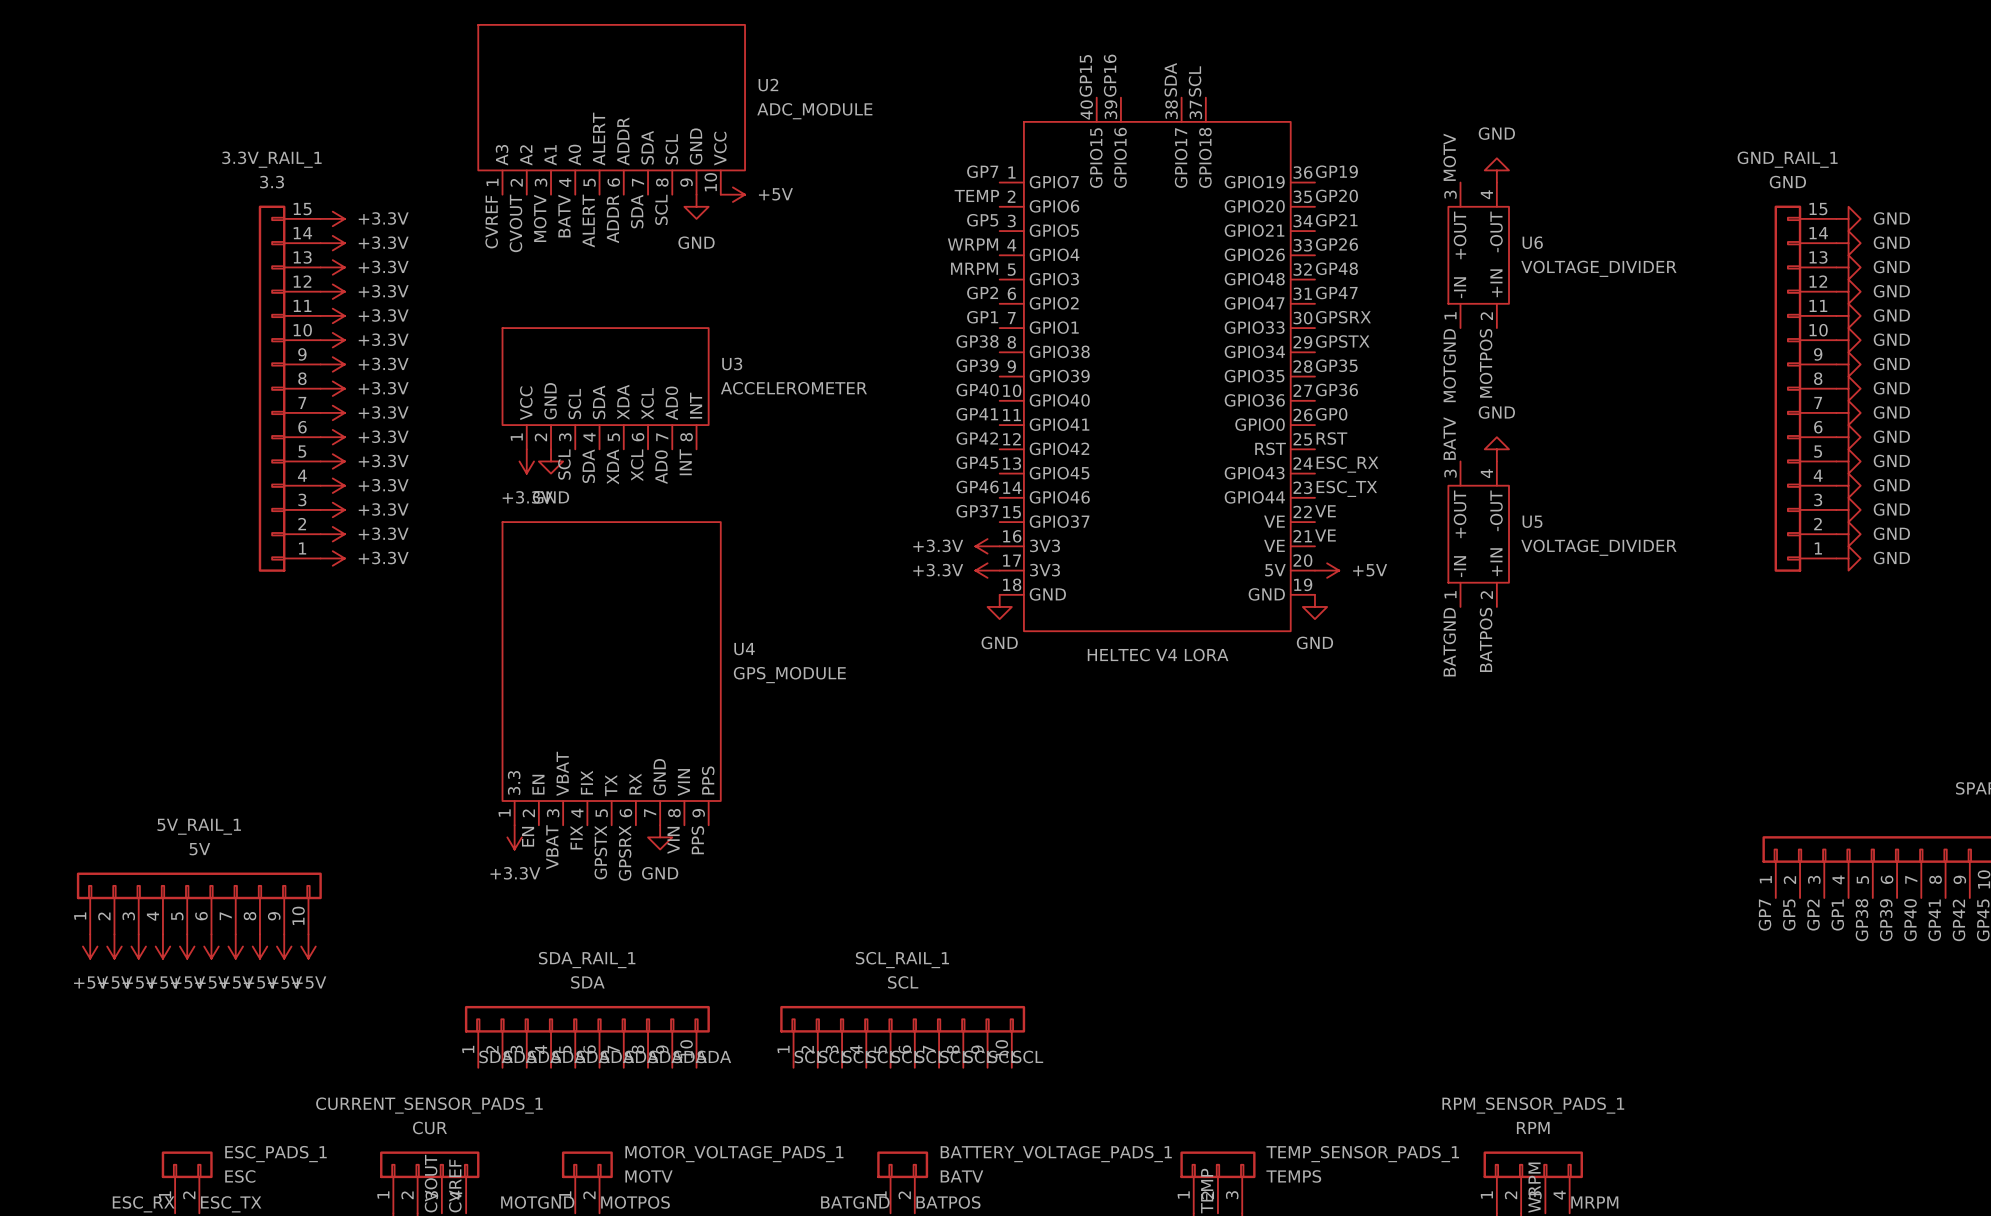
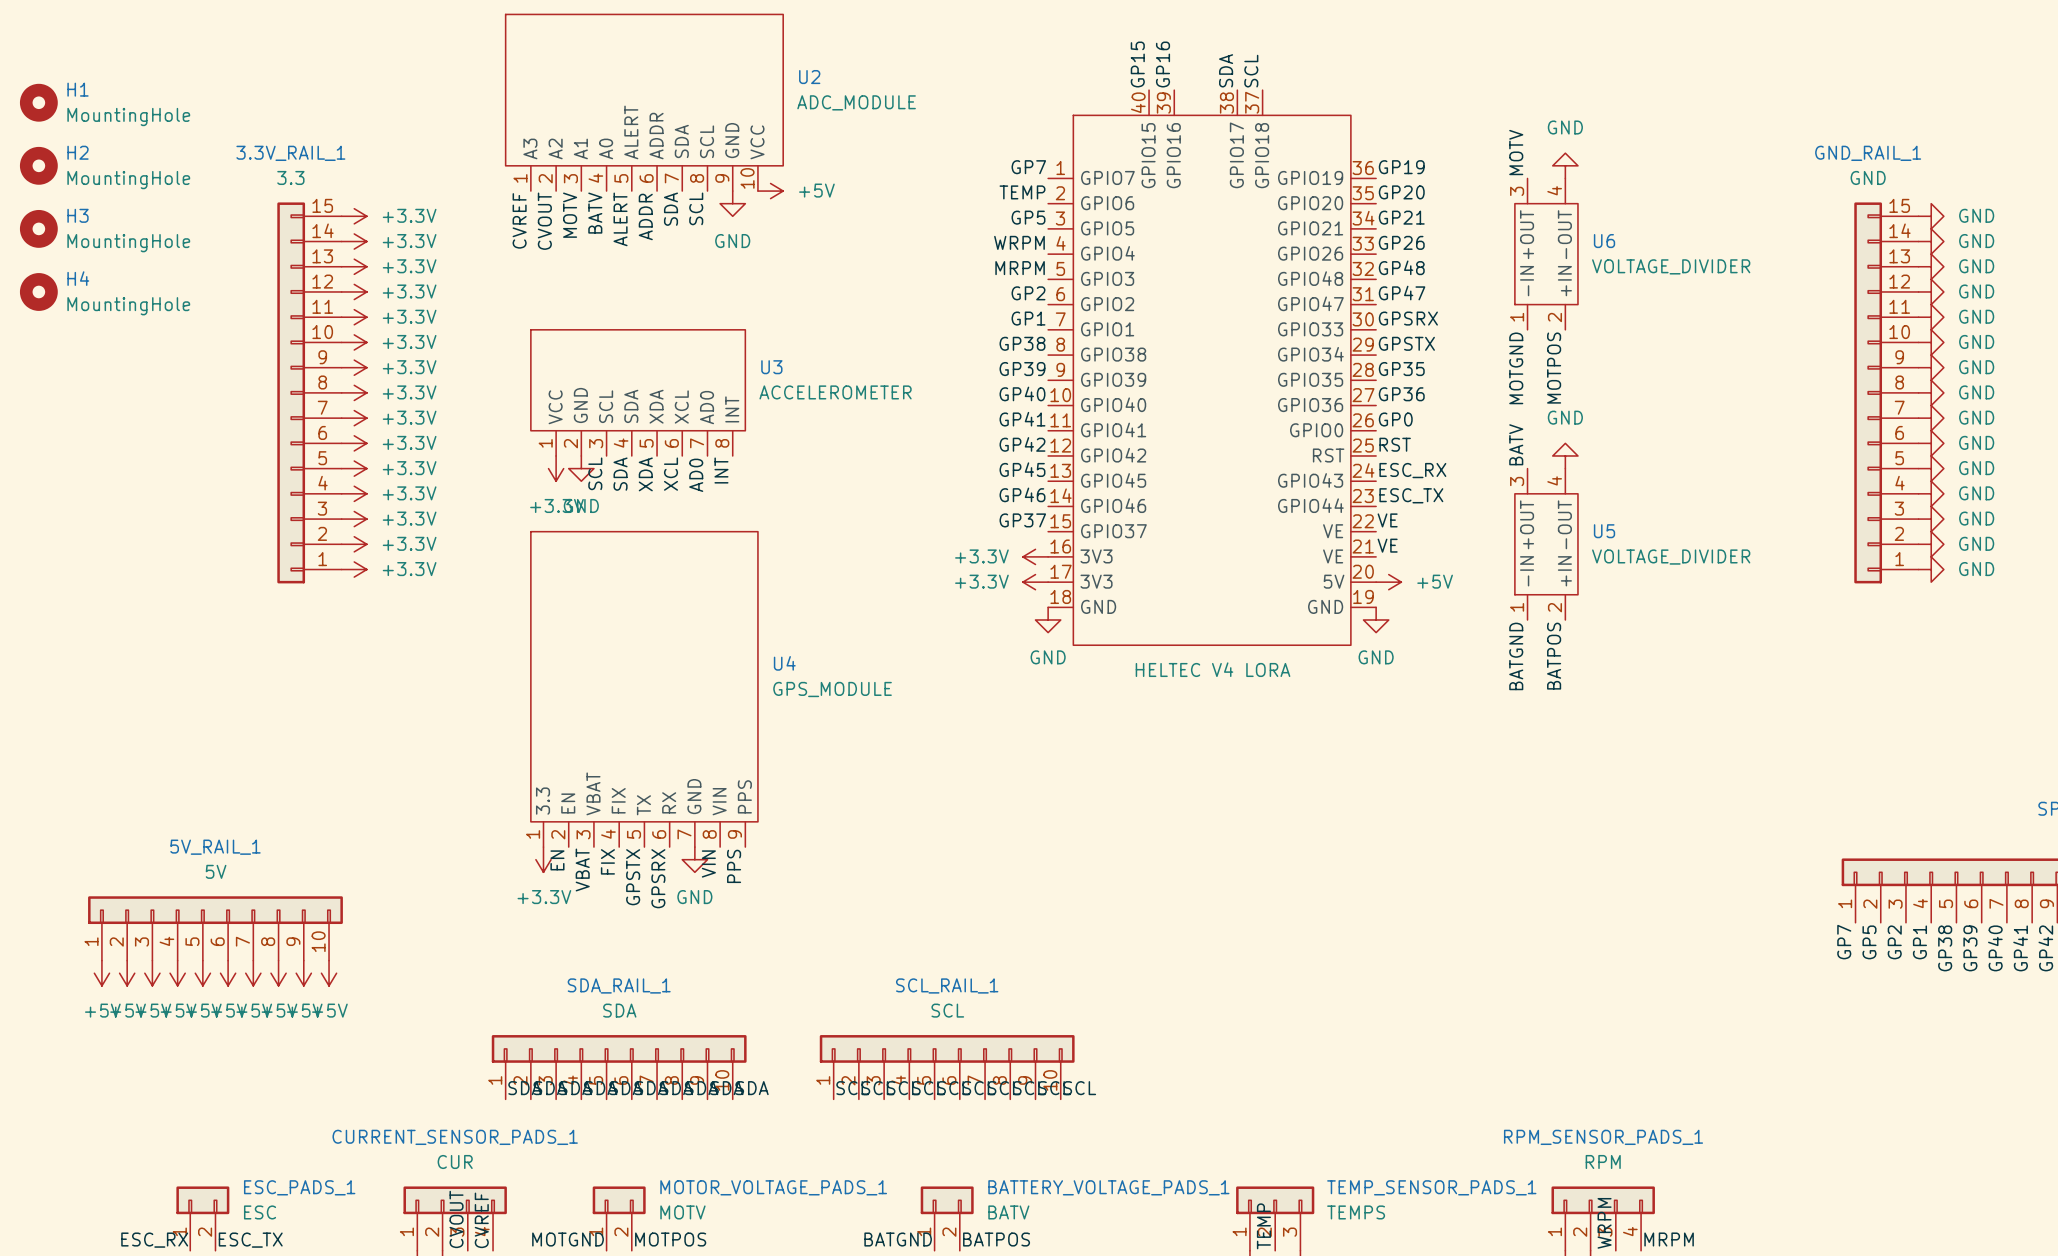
H1: none -> MountingHole (38, 102)
H2: none -> MountingHole (38, 165)
H3: none -> MountingHole (38, 228)
H4: none -> MountingHole (38, 291)

